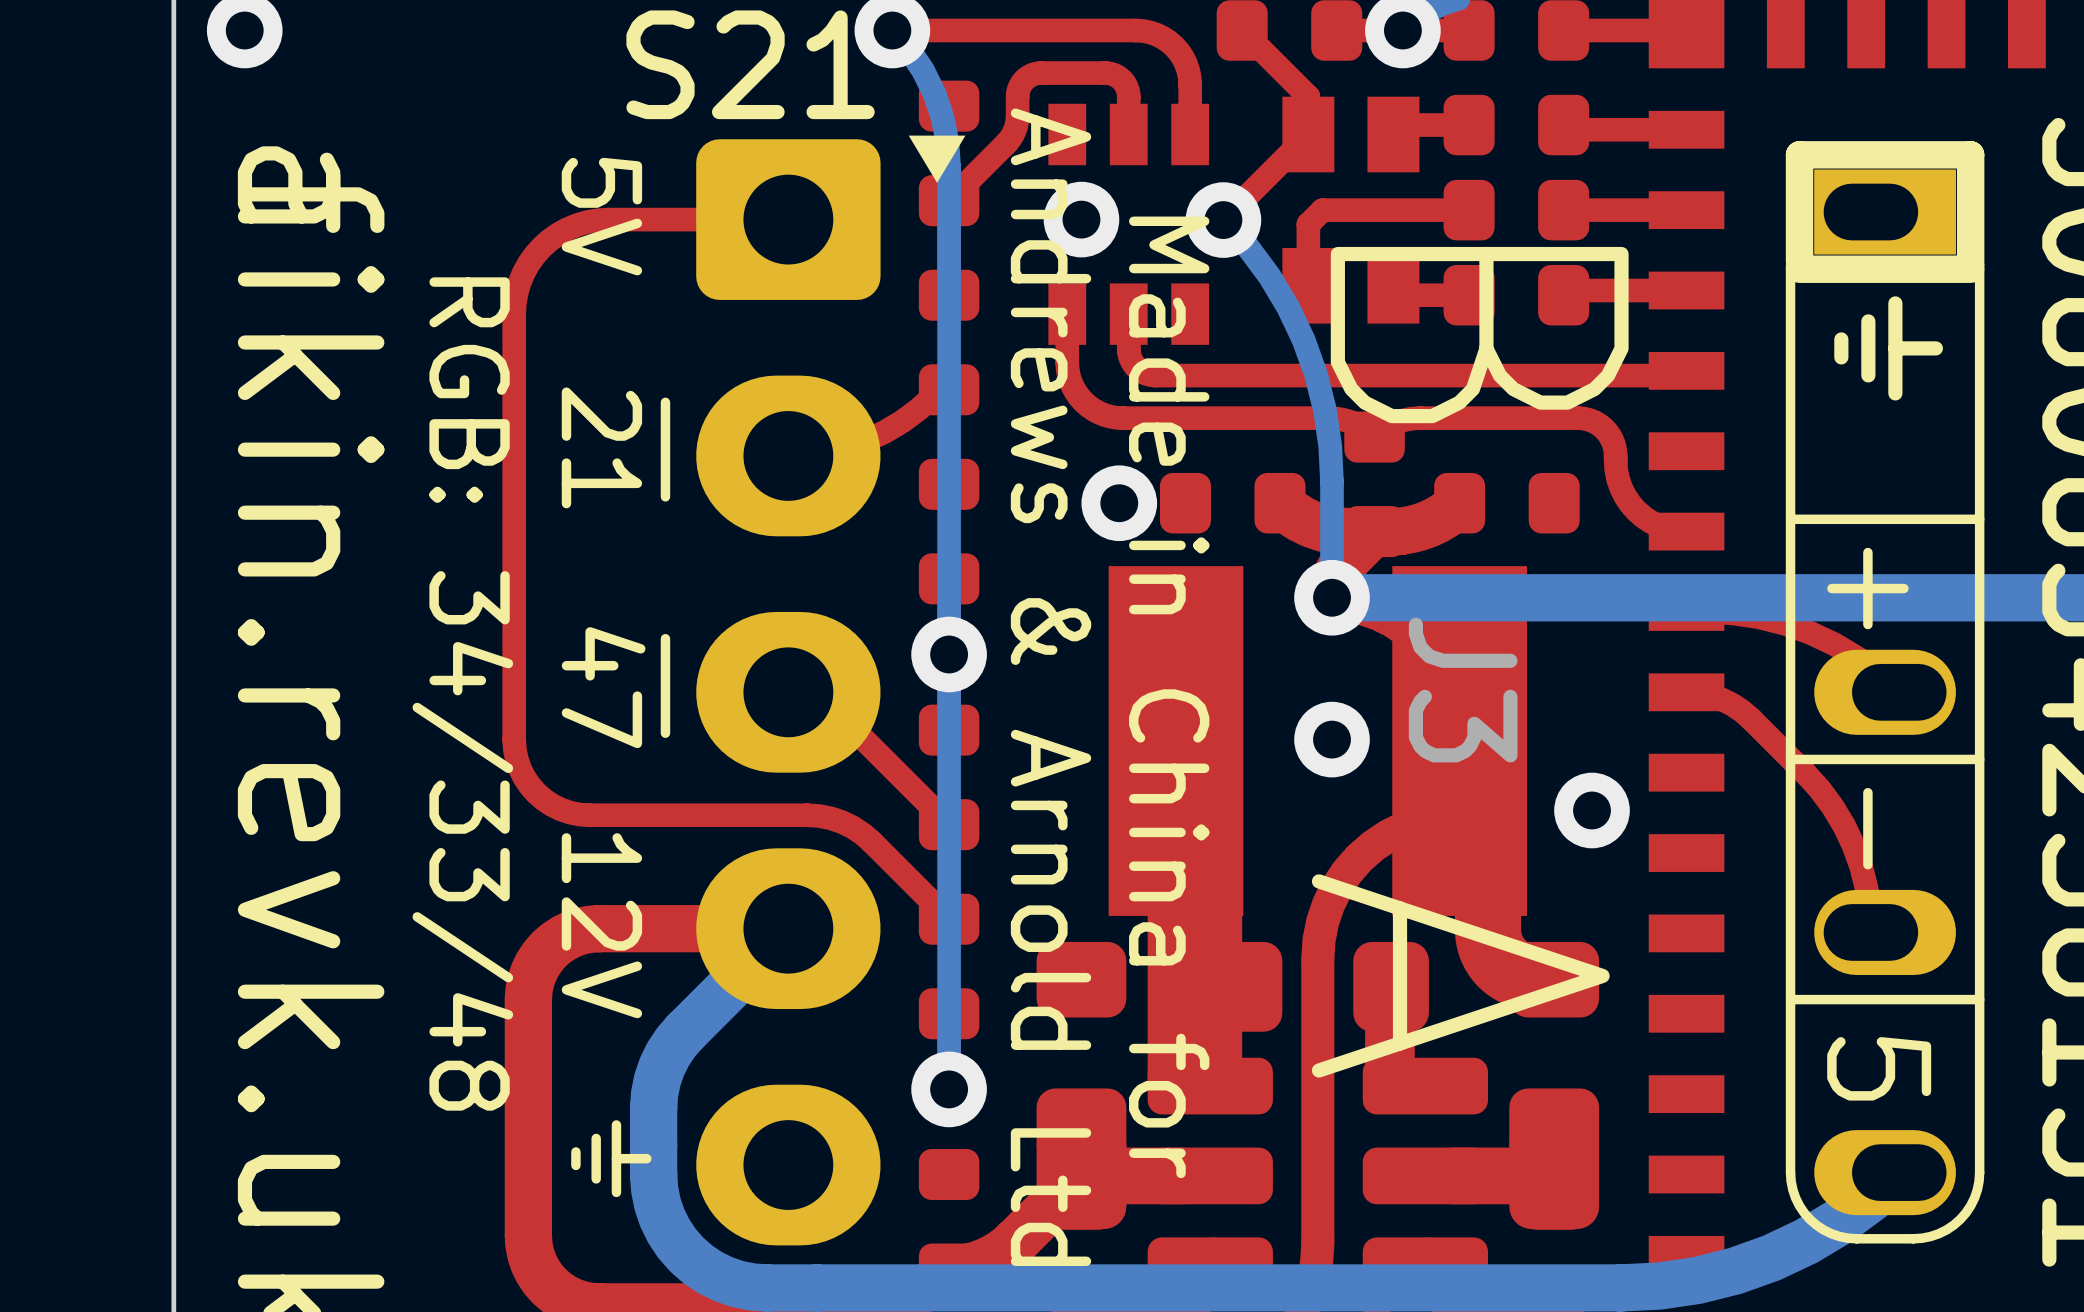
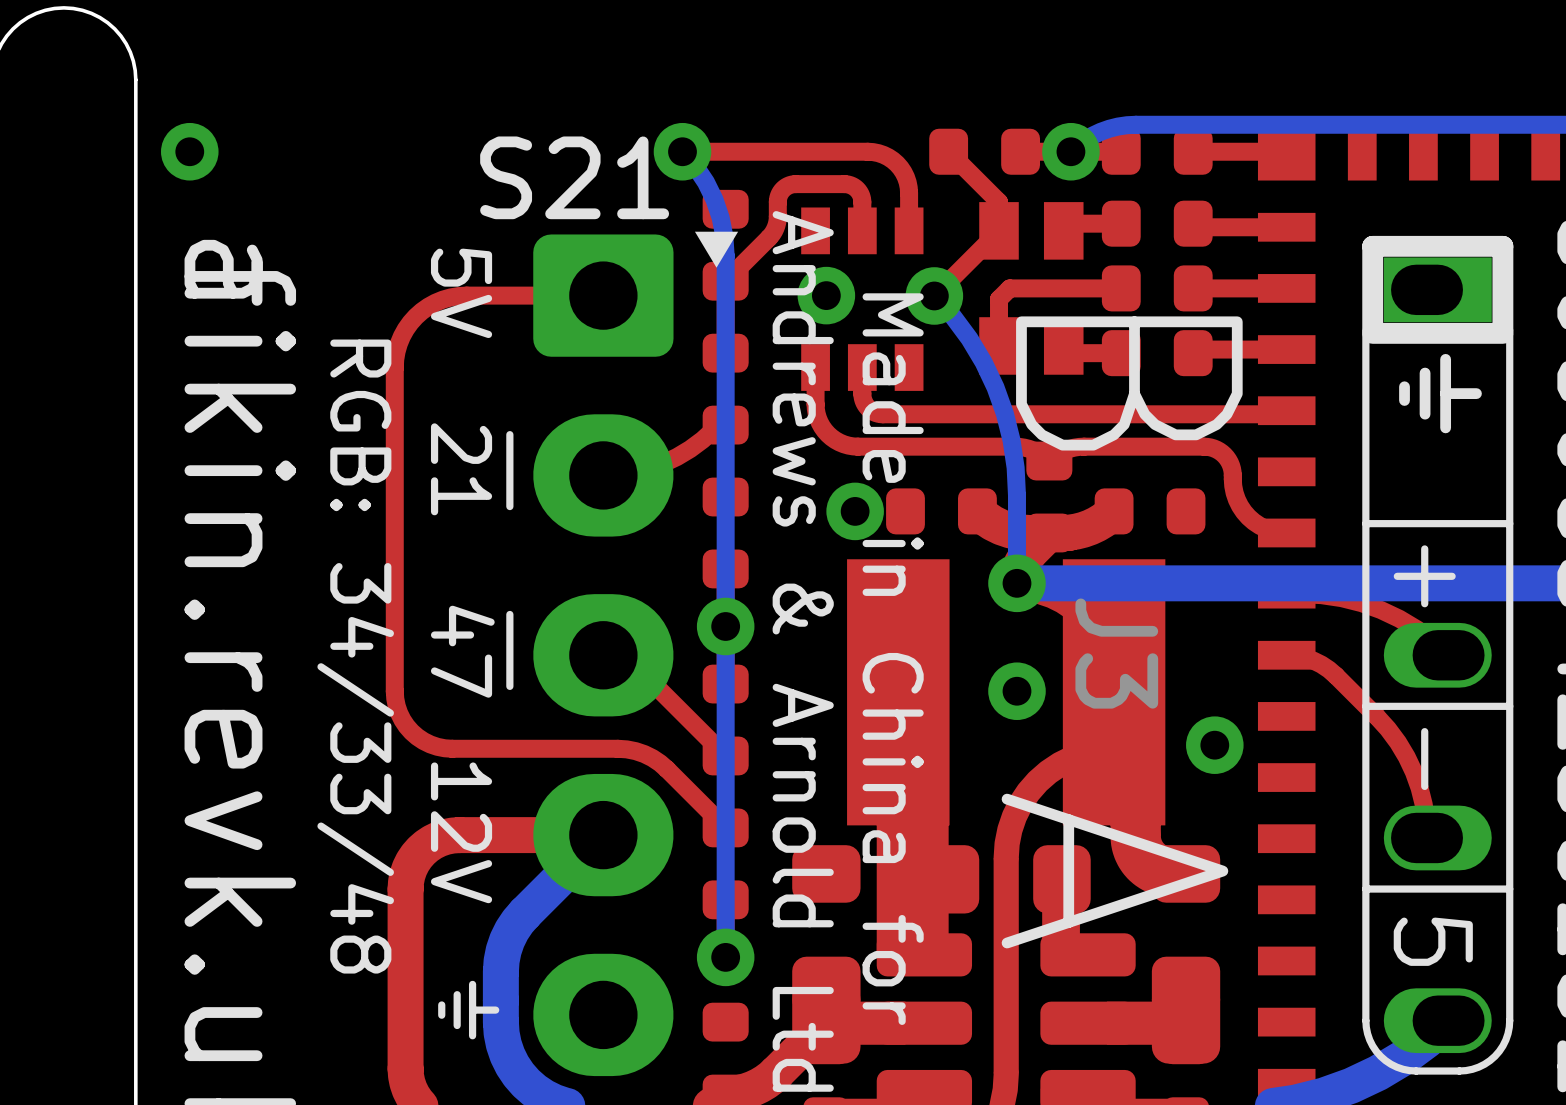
J3 footprint: [1785, 141, 1985, 1244] -> [1362, 235, 1514, 1075]

